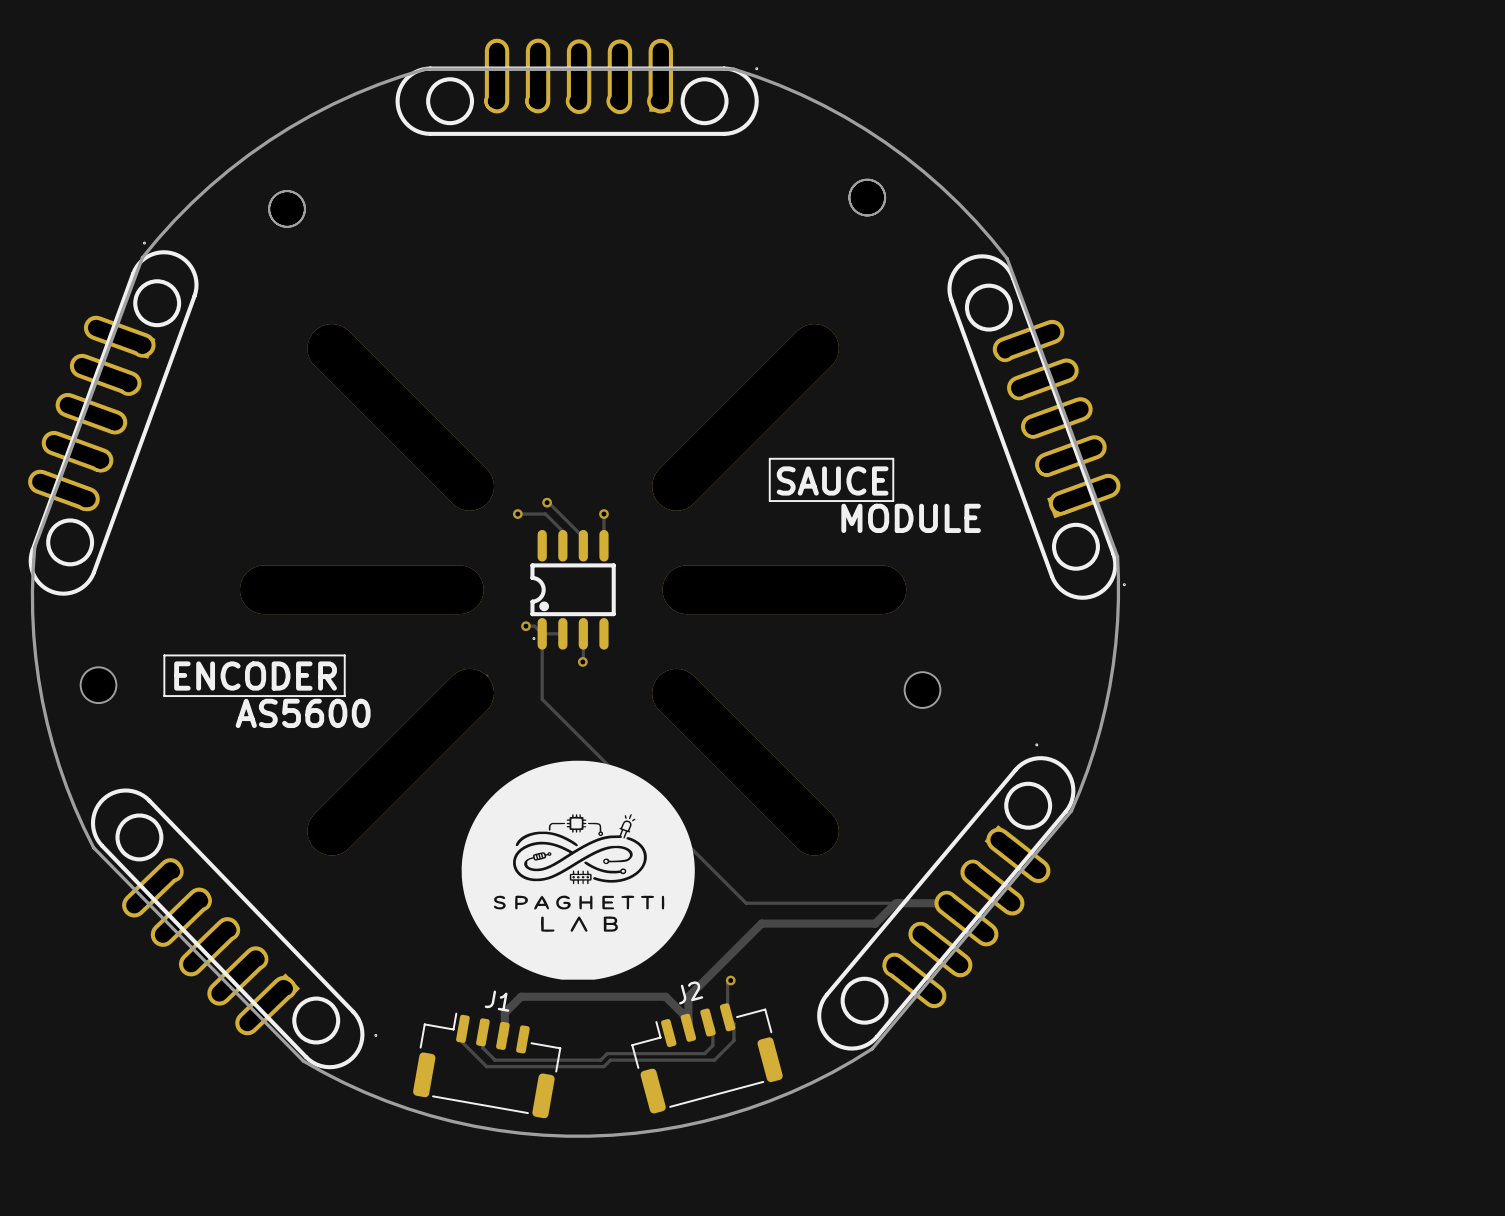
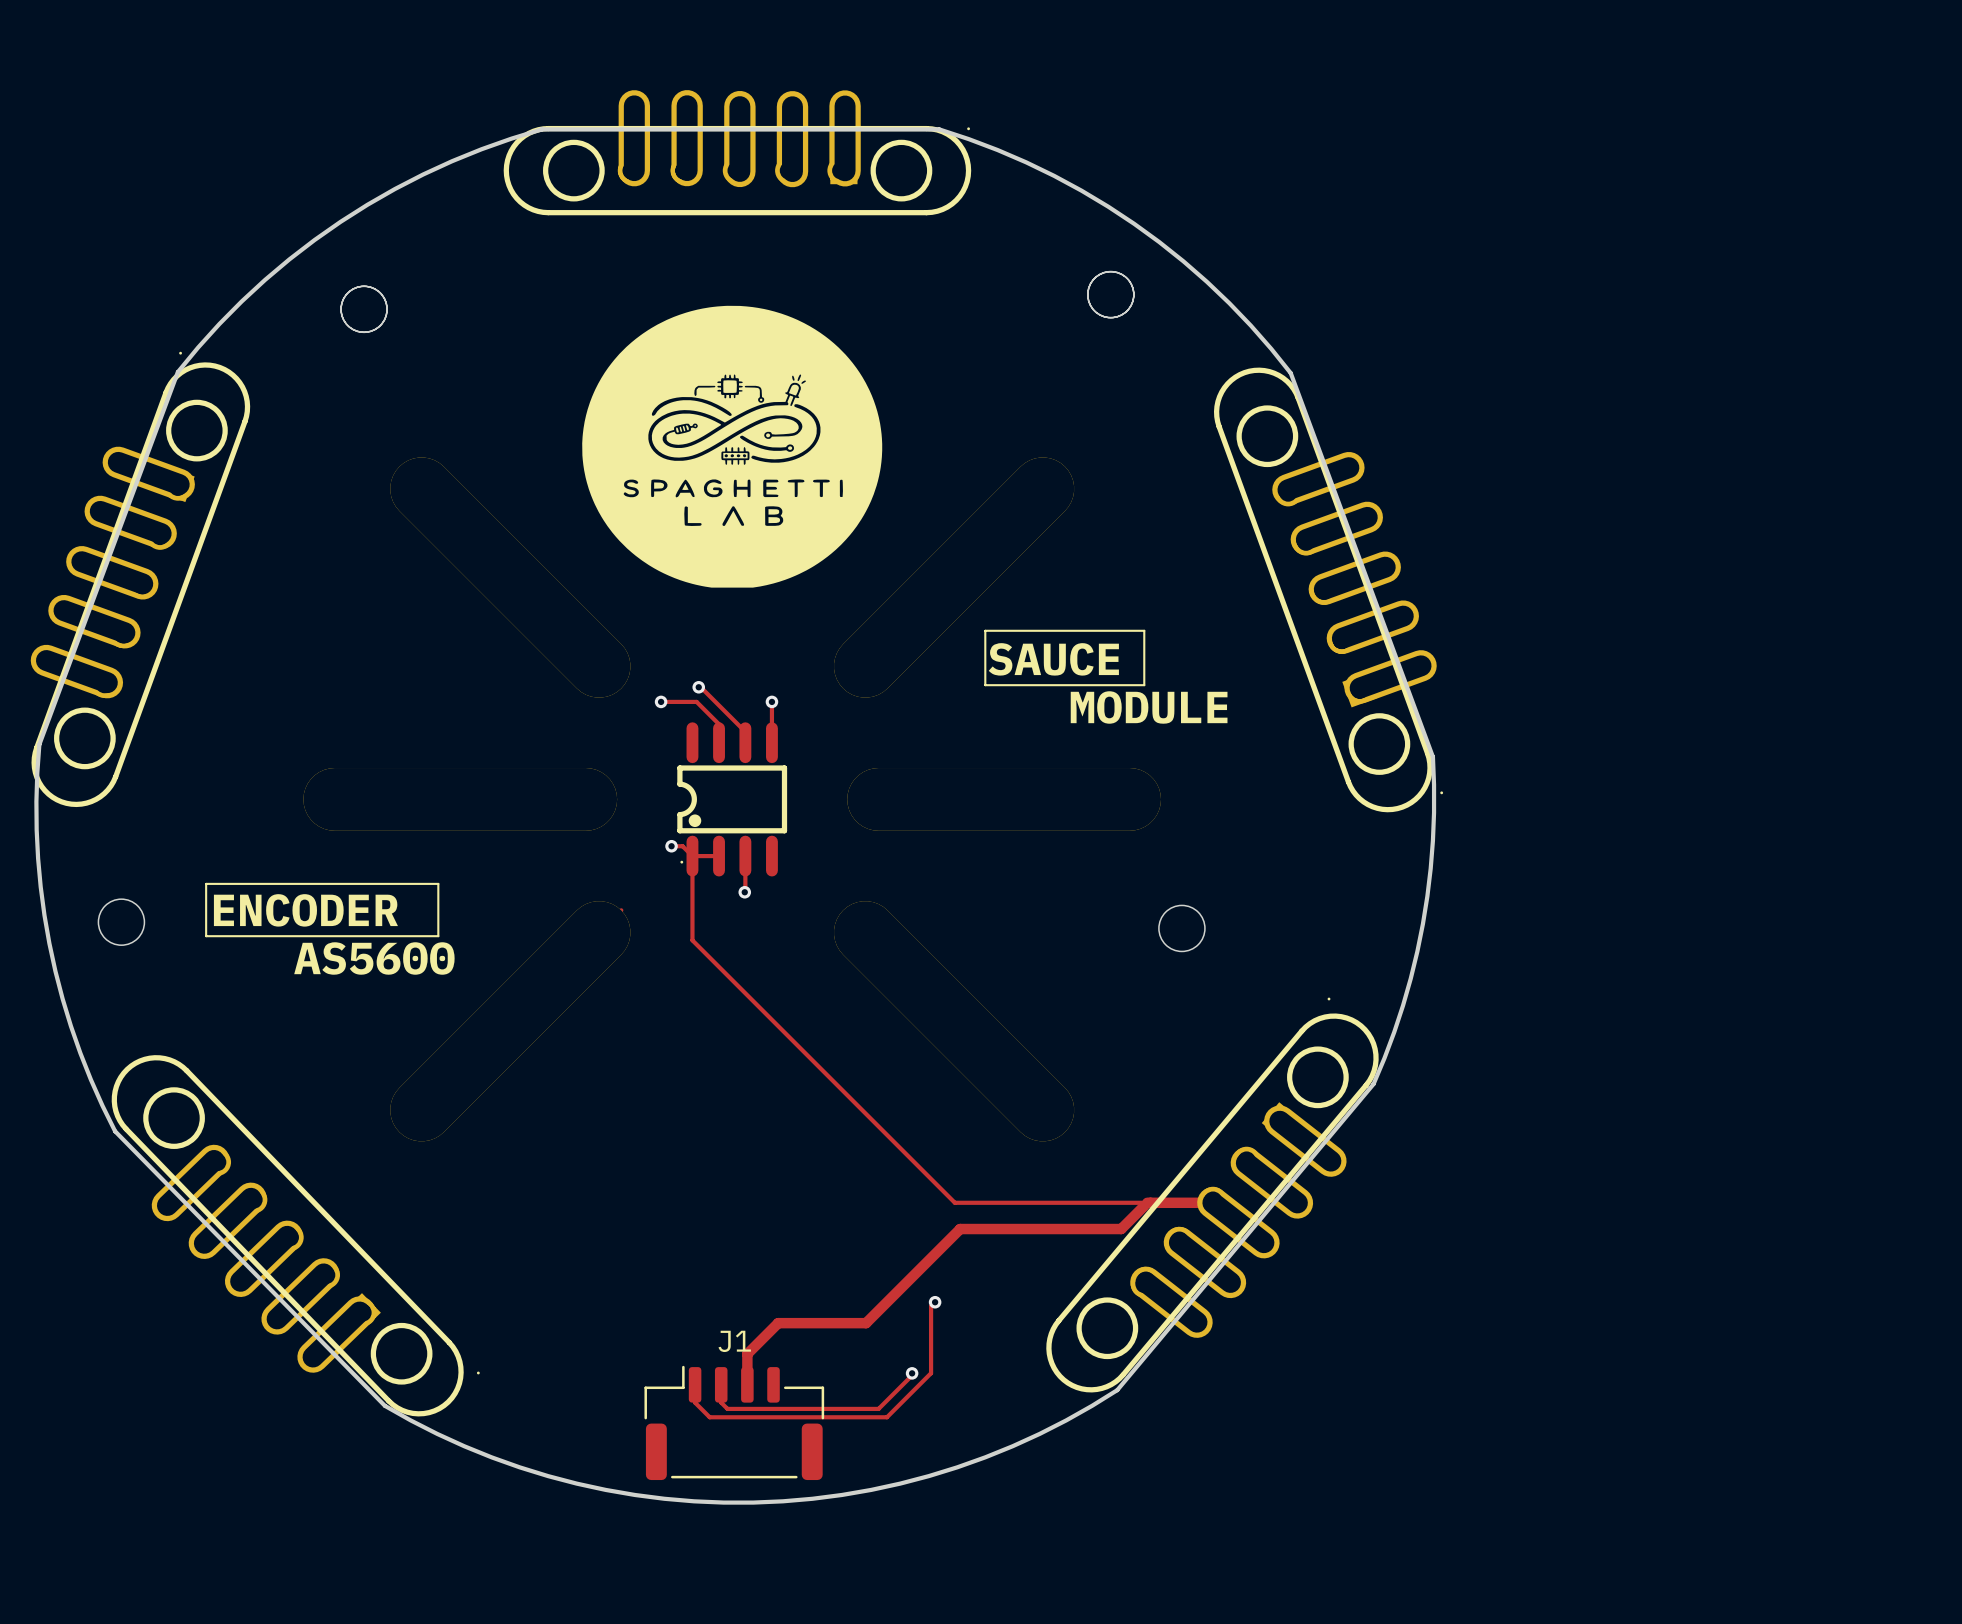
drawing: none -> [582, 305, 883, 588]
drawing: [461, 760, 695, 980] -> none
track: (761, 923) (688, 996) (688, 1027) -> (974, 1229) (960, 1229) (866, 1323) (851, 1323)
track: (608, 996) (521, 996) (504, 1013) (504, 1033) (502, 1035) -> (778, 1323) (747, 1354) (747, 1384)
track: (665, 996) (688, 1019) -> none
track: (727, 1017) (734, 1023) (734, 1040) (714, 1060) (610, 1060) (603, 1066) (486, 1066) (462, 1042) (462, 1028) -> (931, 1349) (931, 1373) (886, 1417) (709, 1417) (695, 1402) (695, 1384)
track: (482, 1032) (482, 1047) (495, 1060) (600, 1060) (607, 1053) (704, 1053) (712, 1045) (712, 1037) -> (721, 1384) (721, 1402) (727, 1408) (878, 1408) (912, 1375)
via: none -> (912, 1373)
J2: (707, 1058) -> none
J1 rotation: 0° (487, 1065) -> 10° counterclockwise (734, 1422)

